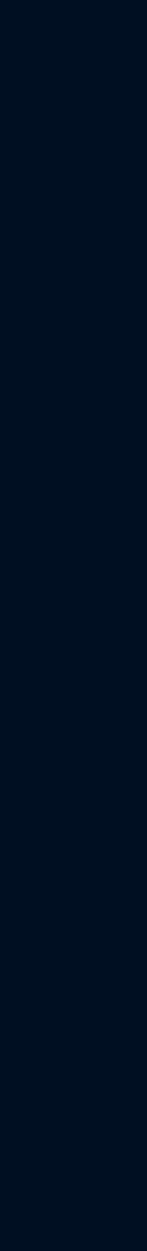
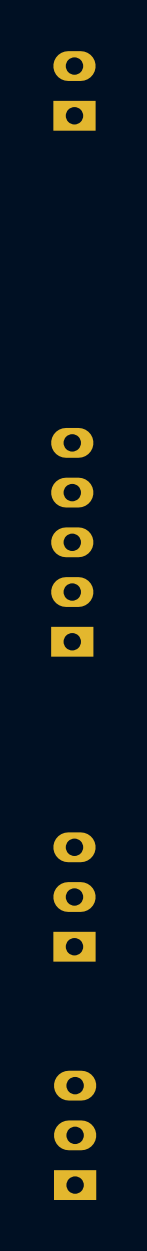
part: none -> (74, 90)
part: none -> (72, 542)
part: none -> (74, 897)
part: none -> (75, 1135)

